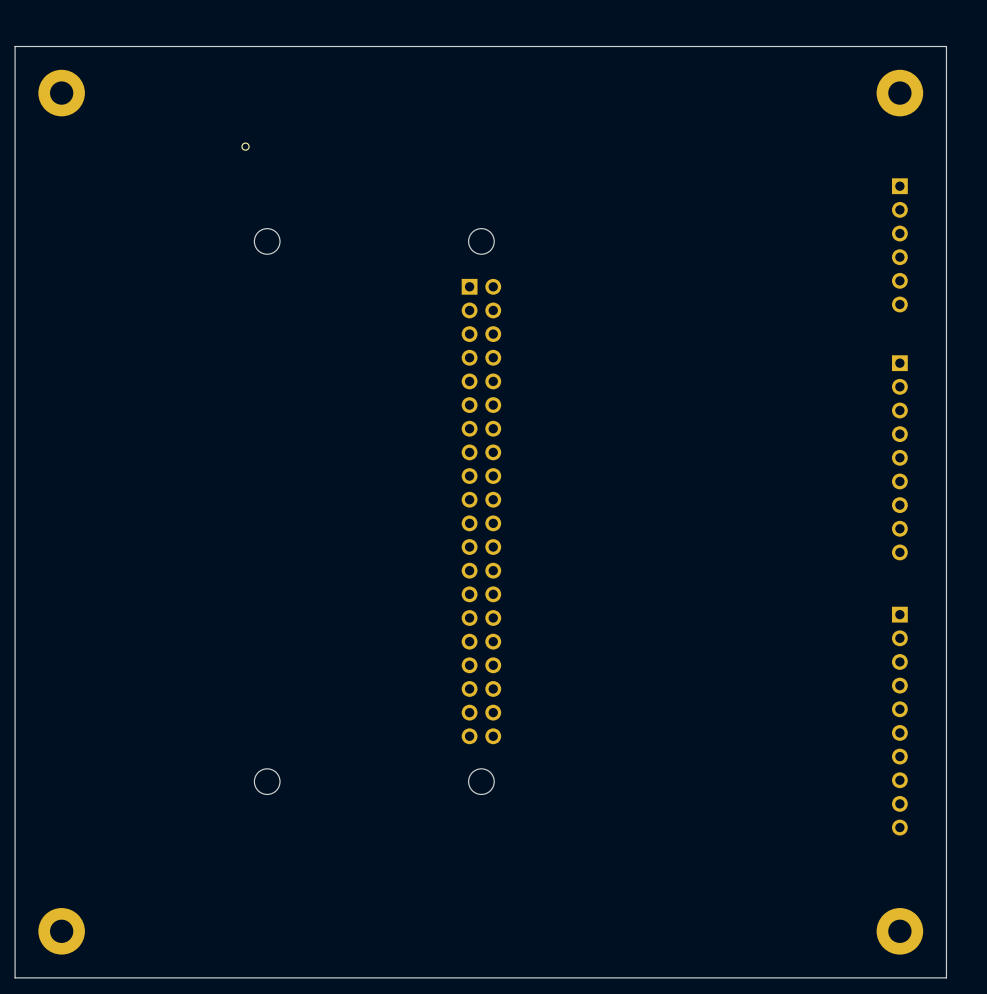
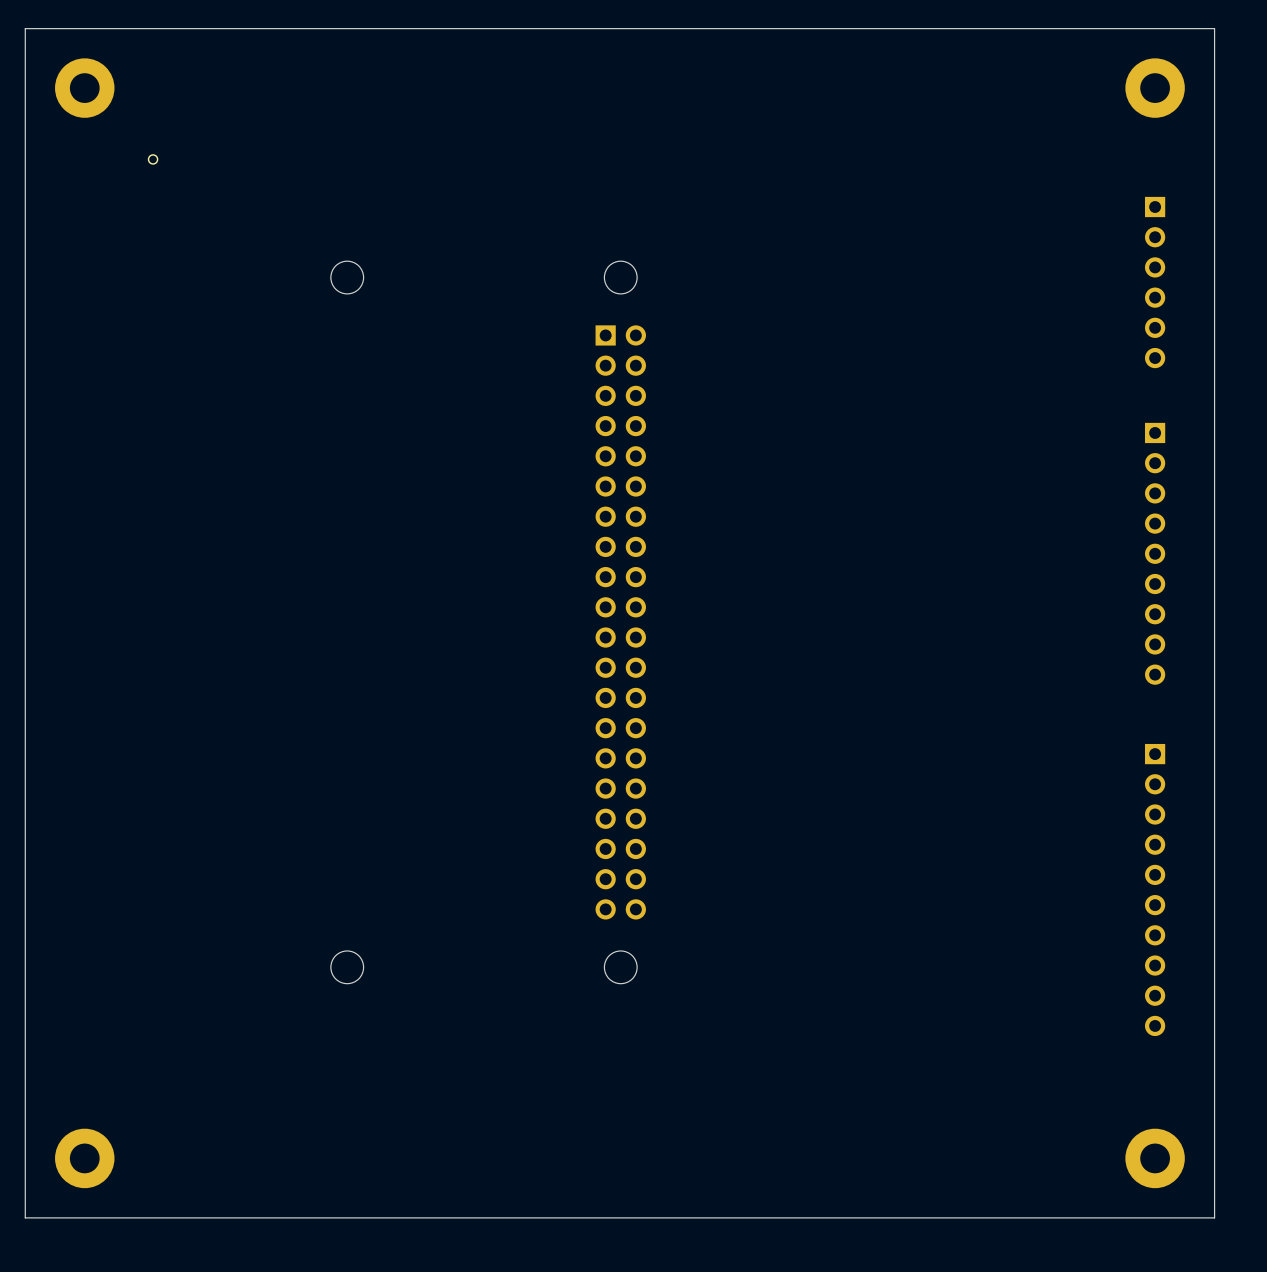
part position: (245, 146) -> (153, 159)

